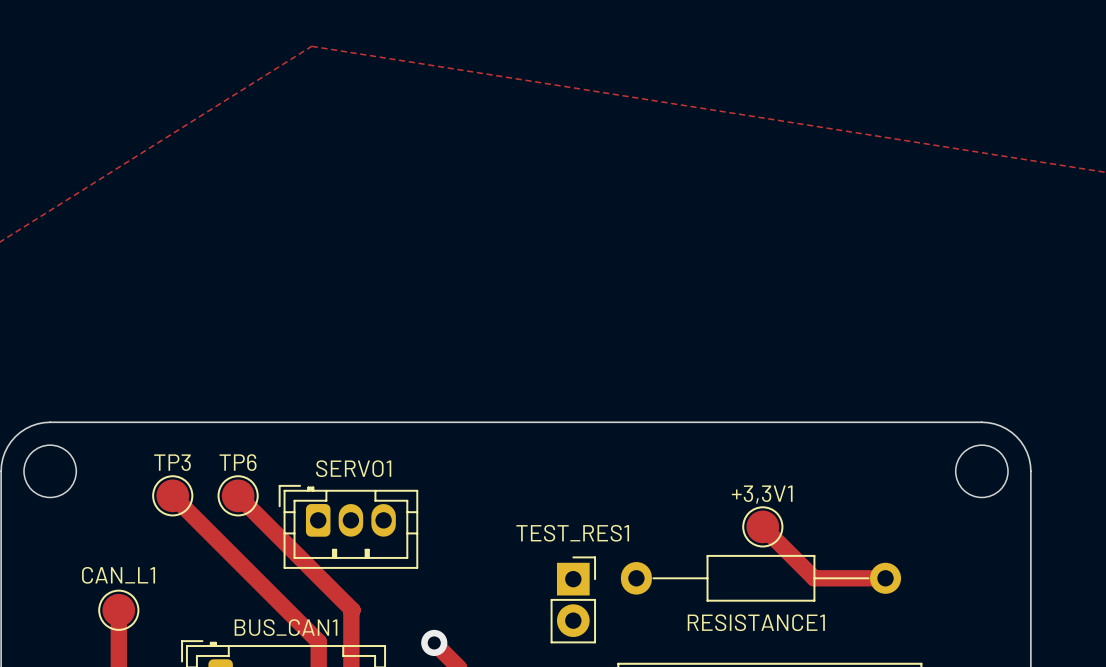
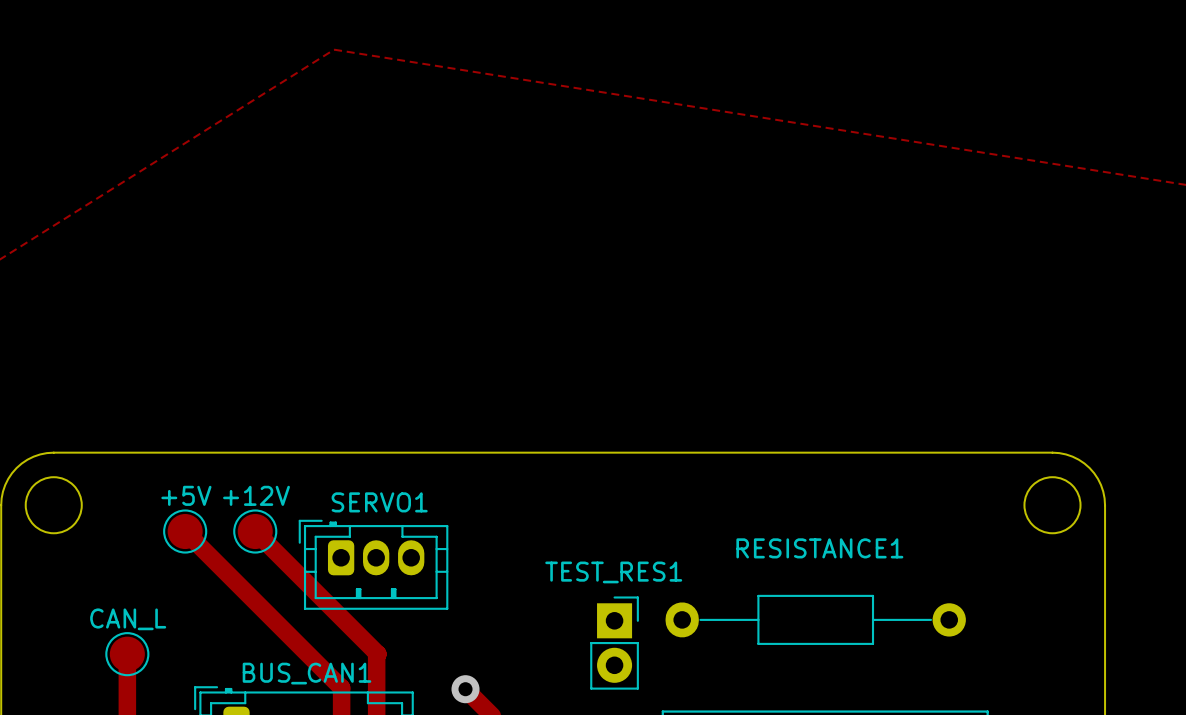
TP3 name: TP3 (172, 462) -> +5V (186, 495)
TP6 name: TP6 (238, 462) -> +12V (256, 495)
track: (762, 526) (814, 578) (885, 578) -> none
+3,3V1: (762, 526) -> none
CAN_L1 name: CAN_L1 (118, 575) -> CAN_L (128, 619)
RESISTANCE1 name position: RESISTANCE1 (756, 622) -> RESISTANCE1 (819, 548)

